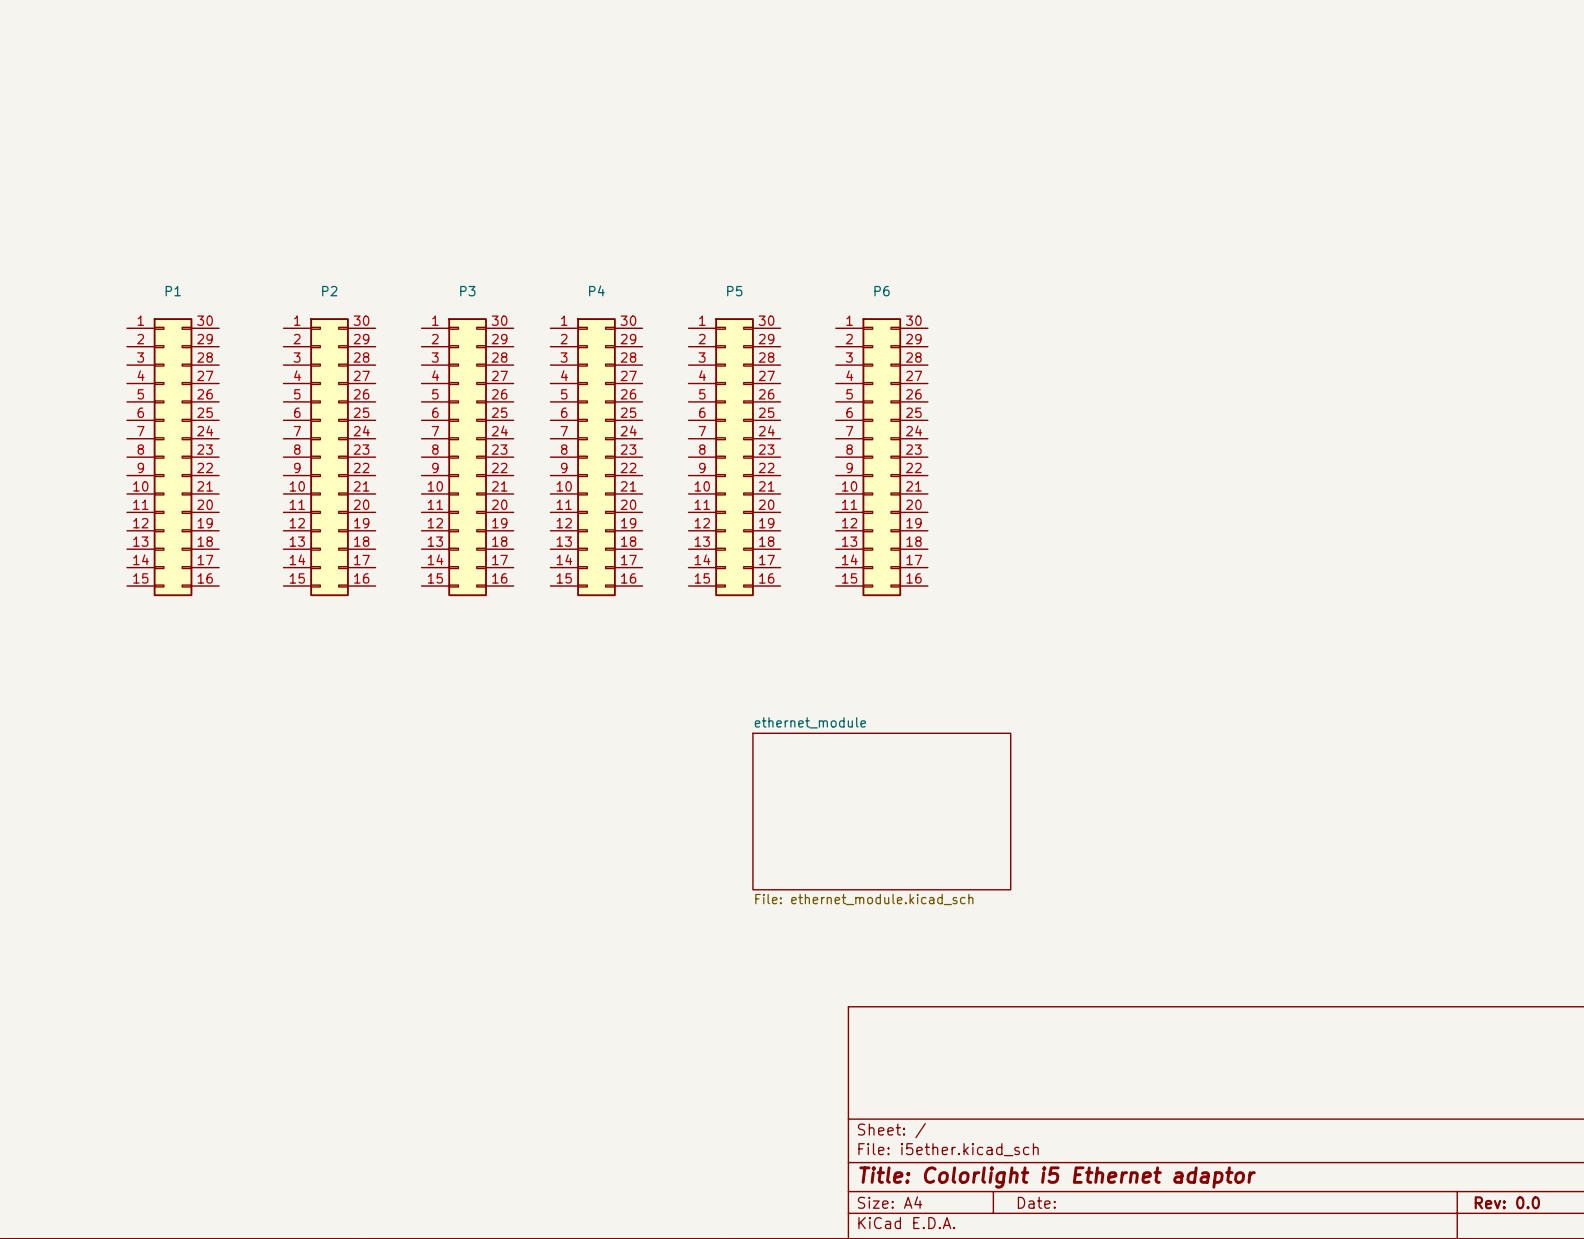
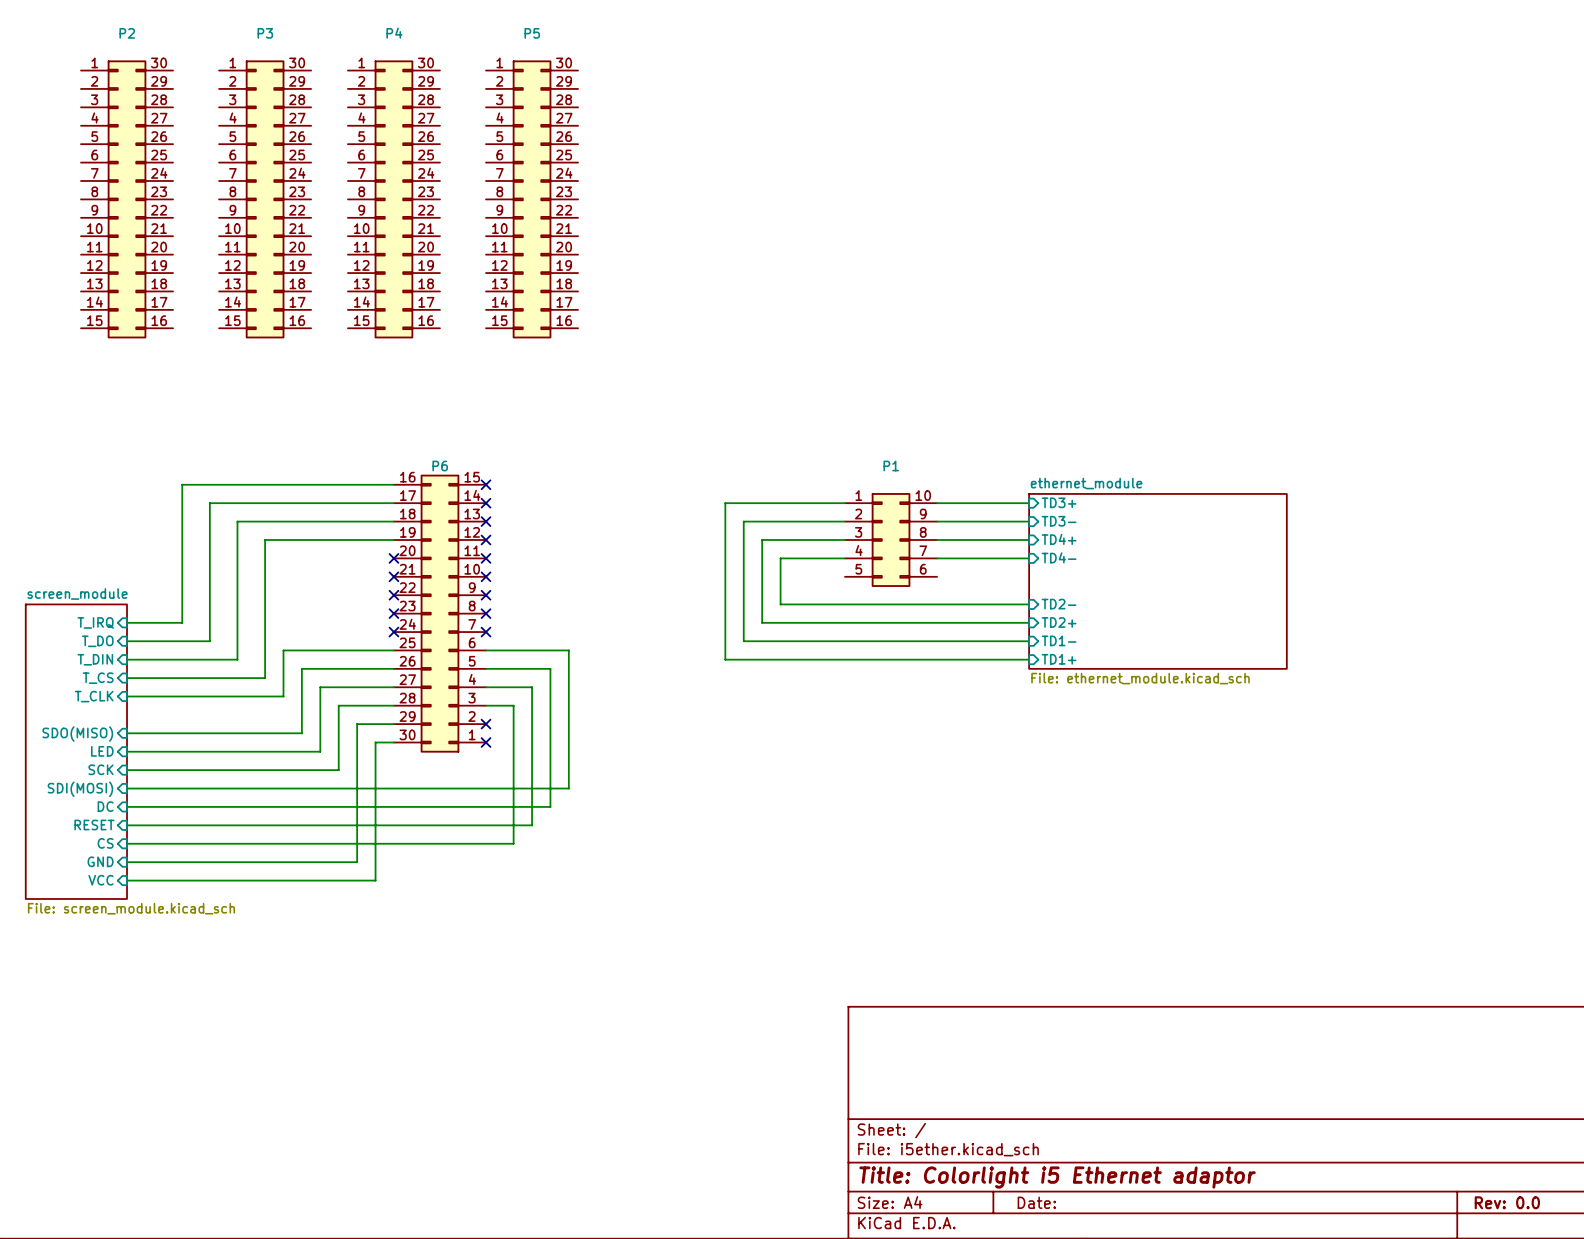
P1 name position: P1 (173, 291) -> P1 (891, 466)
P6 name position: P6 (882, 291) -> P6 (440, 466)
P1 symbol: [127, 318, 220, 597] -> [845, 493, 938, 587]
P2 position: (329, 457) -> (127, 199)
P3 position: (467, 457) -> (265, 199)
P4 position: (596, 457) -> (393, 199)
P5 position: (734, 457) -> (532, 199)
P6 rotation: 0° (881, 457) -> 180° (439, 613)
P6 position: (881, 457) -> (439, 613)
wire: none -> (393, 484) (182, 484) (182, 622) (127, 622)
no-connect mark: none -> (486, 484)
sheet pin: none -> TD3+ (1059, 502)
wire: none -> (393, 503) (209, 503) (209, 641) (127, 641)
no-connect mark: none -> (486, 503)
wire: none -> (845, 503) (725, 503) (725, 659) (1029, 659)
wire: none -> (937, 503) (1029, 503)
wire: none -> (393, 521) (237, 521) (237, 659) (127, 659)
no-connect mark: none -> (486, 521)
wire: none -> (845, 521) (743, 521) (743, 641) (1029, 641)
wire: none -> (937, 521) (1029, 521)
sheet pin: none -> TD3- (1059, 521)
wire: none -> (393, 539) (265, 539) (265, 678) (127, 678)
no-connect mark: none -> (486, 539)
wire: none -> (845, 539) (762, 539) (762, 622) (1029, 622)
wire: none -> (937, 539) (1029, 539)
sheet pin: none -> TD4+ (1059, 539)
sheet pin: none -> TD4- (1059, 557)
no-connect mark: none -> (393, 558)
no-connect mark: none -> (486, 558)
wire: none -> (845, 558) (780, 558) (780, 604) (1029, 604)
wire: none -> (937, 558) (1029, 558)
no-connect mark: none -> (393, 576)
no-connect mark: none -> (486, 576)
sheet ethernet_module: none -> File: ethernet_module.kicad_sch (1157, 581)
no-connect mark: none -> (393, 595)
no-connect mark: none -> (486, 595)
sheet pin: none -> TD2- (1059, 604)
no-connect mark: none -> (393, 613)
no-connect mark: none -> (486, 613)
sheet pin: none -> T_IRQ (95, 622)
sheet pin: none -> TD2+ (1059, 622)
no-connect mark: none -> (393, 632)
no-connect mark: none -> (486, 632)
sheet pin: none -> TD1- (1059, 640)
sheet pin: none -> T_DO (97, 641)
wire: none -> (393, 650) (283, 650) (283, 696) (127, 696)
wire: none -> (486, 650) (568, 650) (568, 788) (127, 788)
sheet pin: none -> T_DIN (95, 659)
sheet pin: none -> TD1+ (1059, 659)
wire: none -> (393, 668) (301, 668) (301, 733) (127, 733)
wire: none -> (486, 668) (550, 668) (550, 806) (127, 806)
sheet pin: none -> T_CS (98, 678)
wire: none -> (393, 687) (320, 687) (320, 751) (127, 751)
wire: none -> (486, 687) (532, 687) (532, 825) (127, 825)
sheet pin: none -> T_CLK (94, 696)
wire: none -> (393, 705) (338, 705) (338, 770) (127, 770)
wire: none -> (486, 705) (513, 705) (513, 843) (127, 843)
wire: none -> (393, 724) (357, 724) (357, 862) (127, 862)
no-connect mark: none -> (486, 724)
sheet pin: none -> SDO(MISO) (77, 734)
wire: none -> (393, 742) (375, 742) (375, 880) (127, 880)
no-connect mark: none -> (486, 742)
sheet screen_module: none -> File: screen_module.kicad_sch (76, 751)
sheet pin: none -> LED (102, 751)
sheet pin: none -> SCK (101, 769)
sheet pin: none -> SDI(MOSI) (80, 789)
sheet pin: none -> DC (105, 806)
sheet ethernet_module: File: ethernet_module.kicad_sch (881, 811) -> none
sheet pin: none -> RESET (94, 825)
sheet pin: none -> CS (105, 843)
sheet pin: none -> GND (100, 861)
sheet pin: none -> VCC (101, 880)

